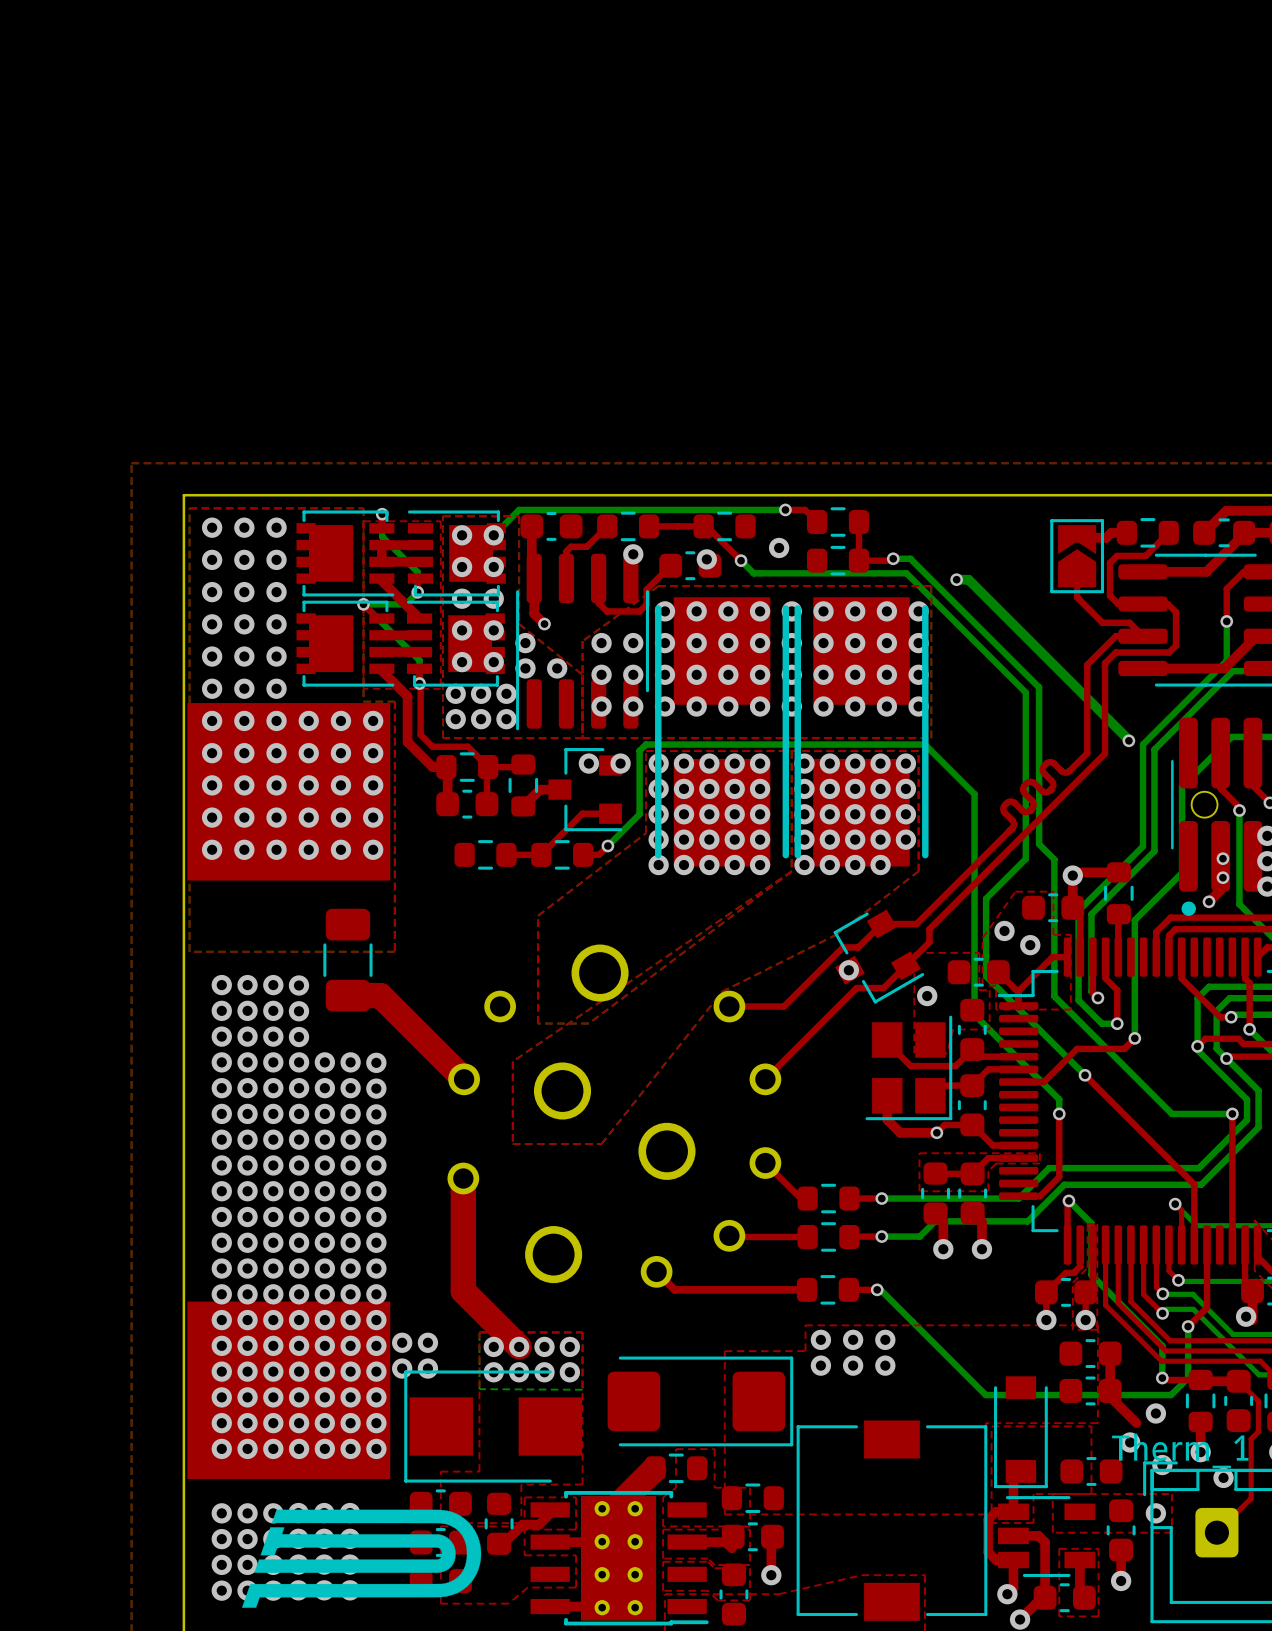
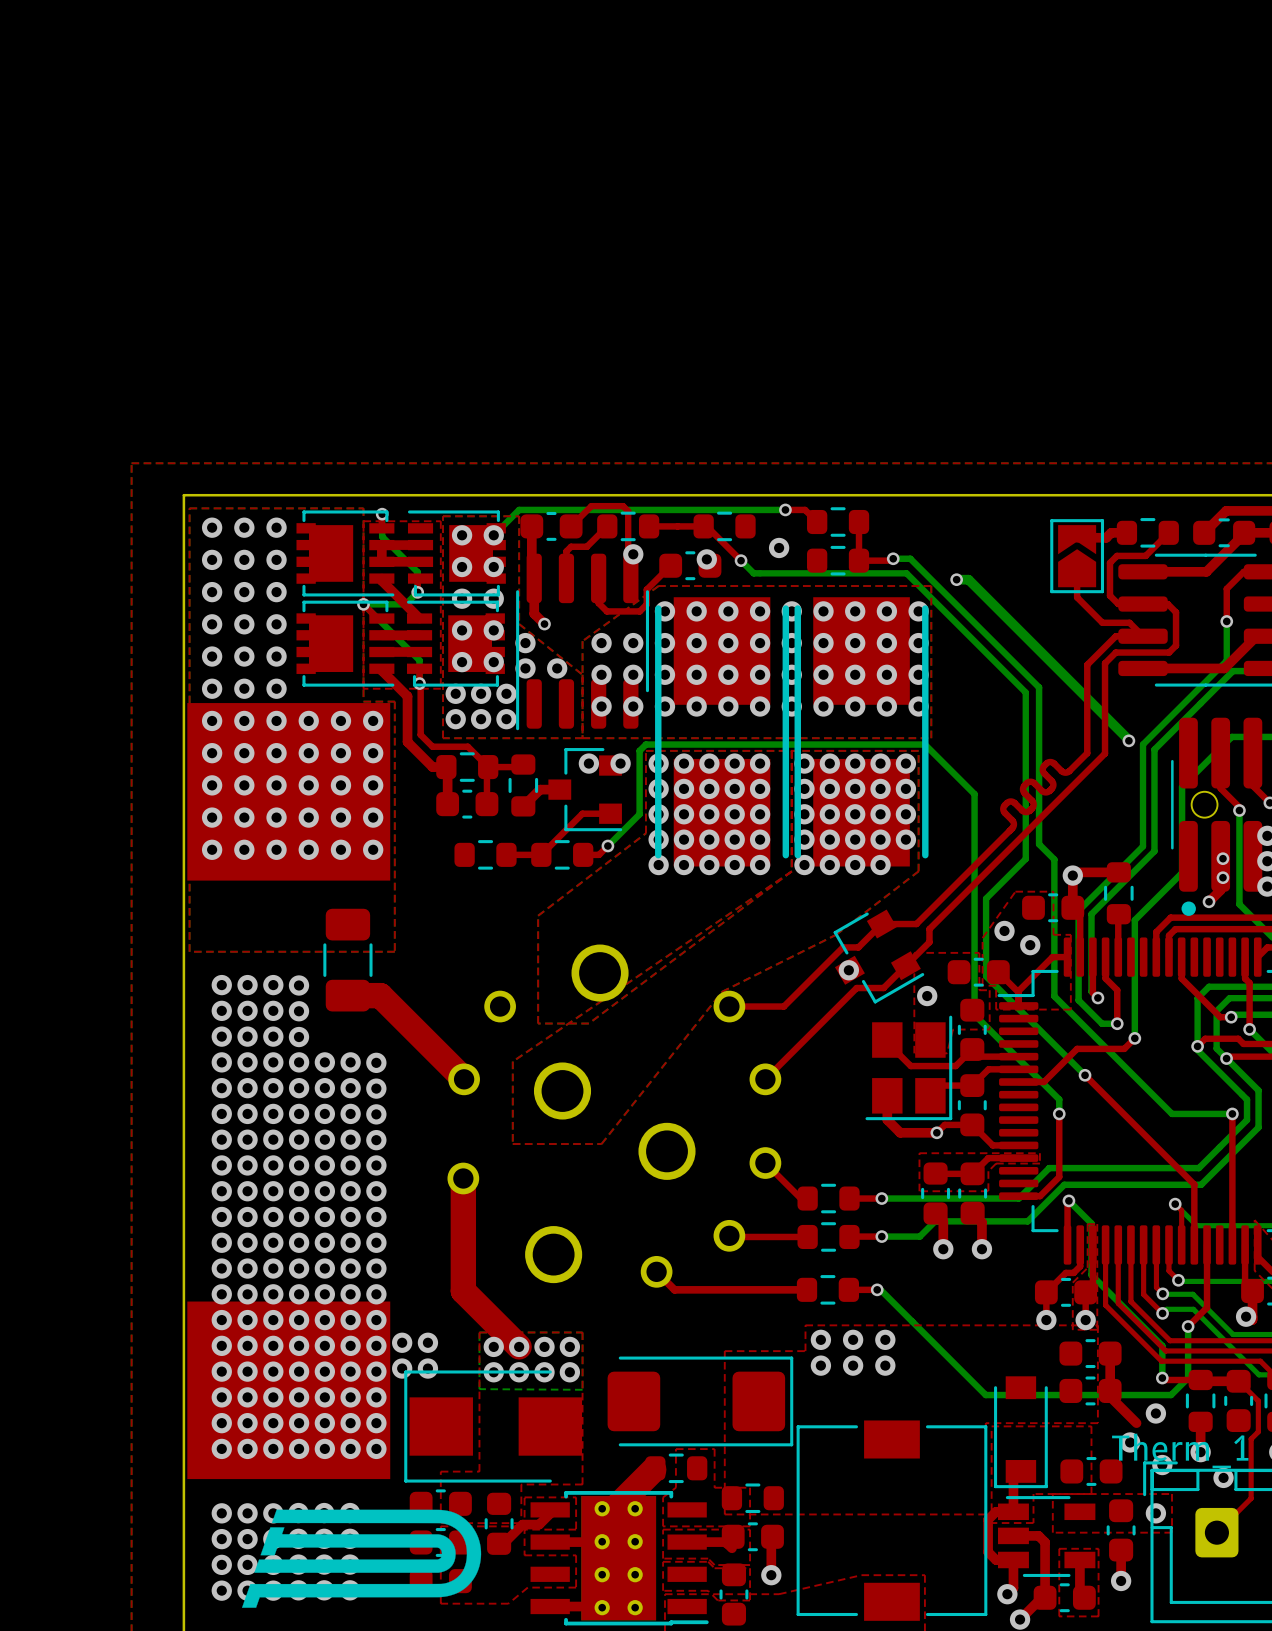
top track: none -> (571, 526) (591, 506) (623, 506) (628, 511) (628, 549) (633, 554)

